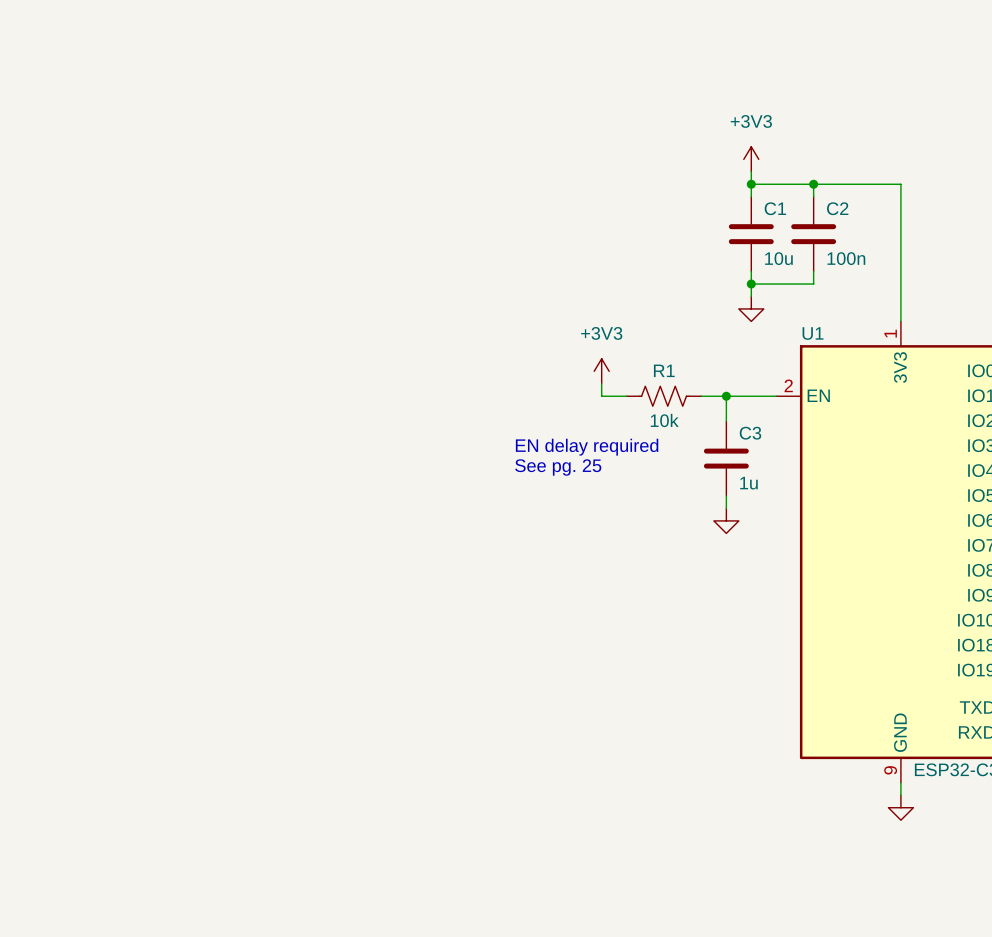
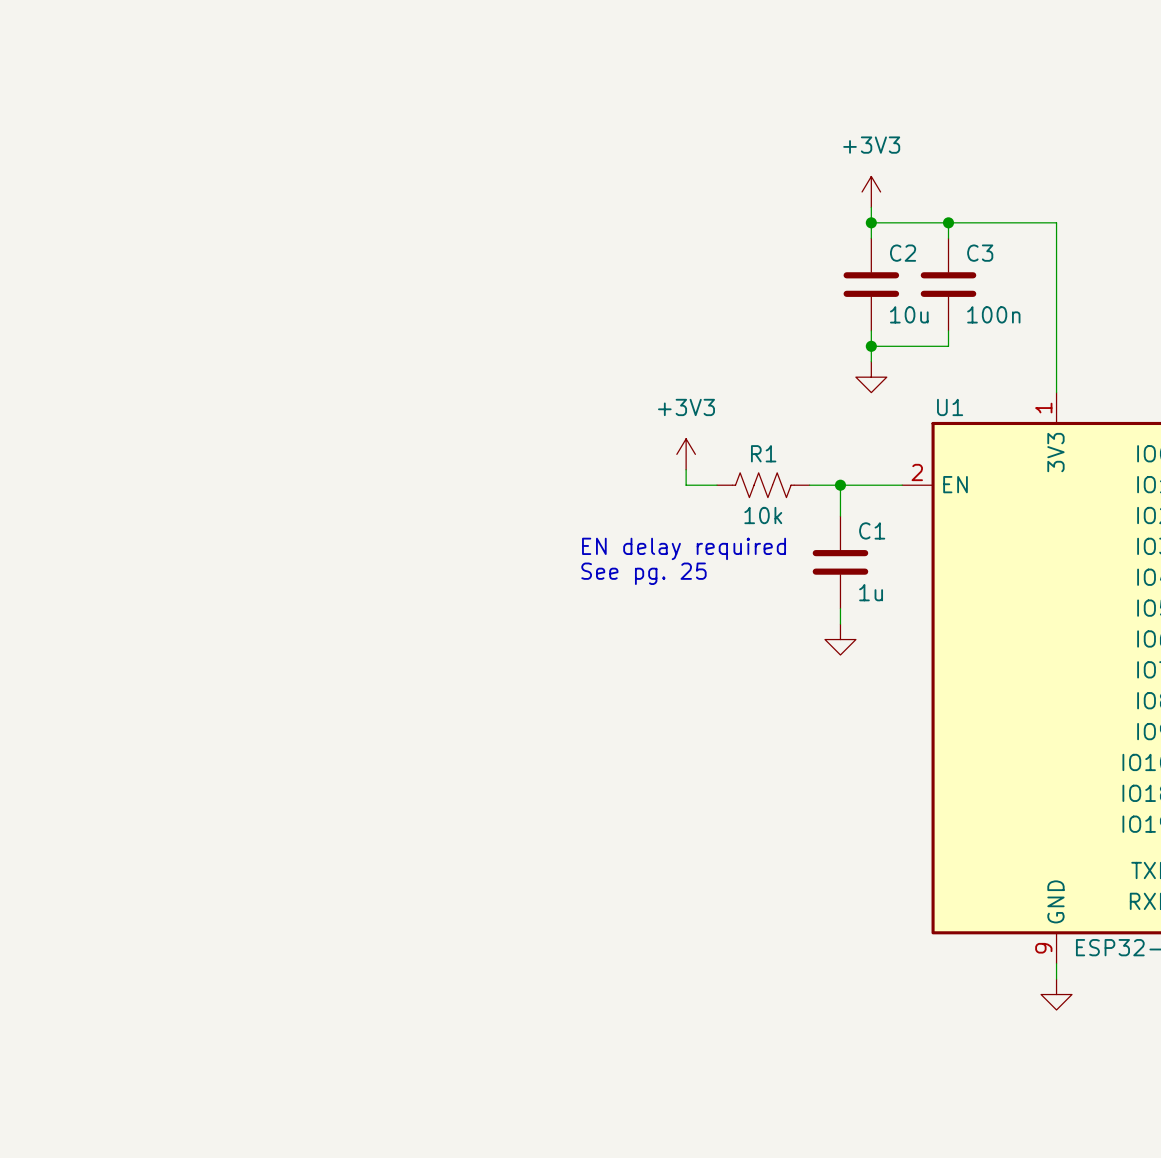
C1 name: C1 (775, 208) -> C2 (903, 253)
C2 name: C2 (837, 208) -> C3 (980, 253)
C3 name: C3 (750, 433) -> C1 (872, 530)

